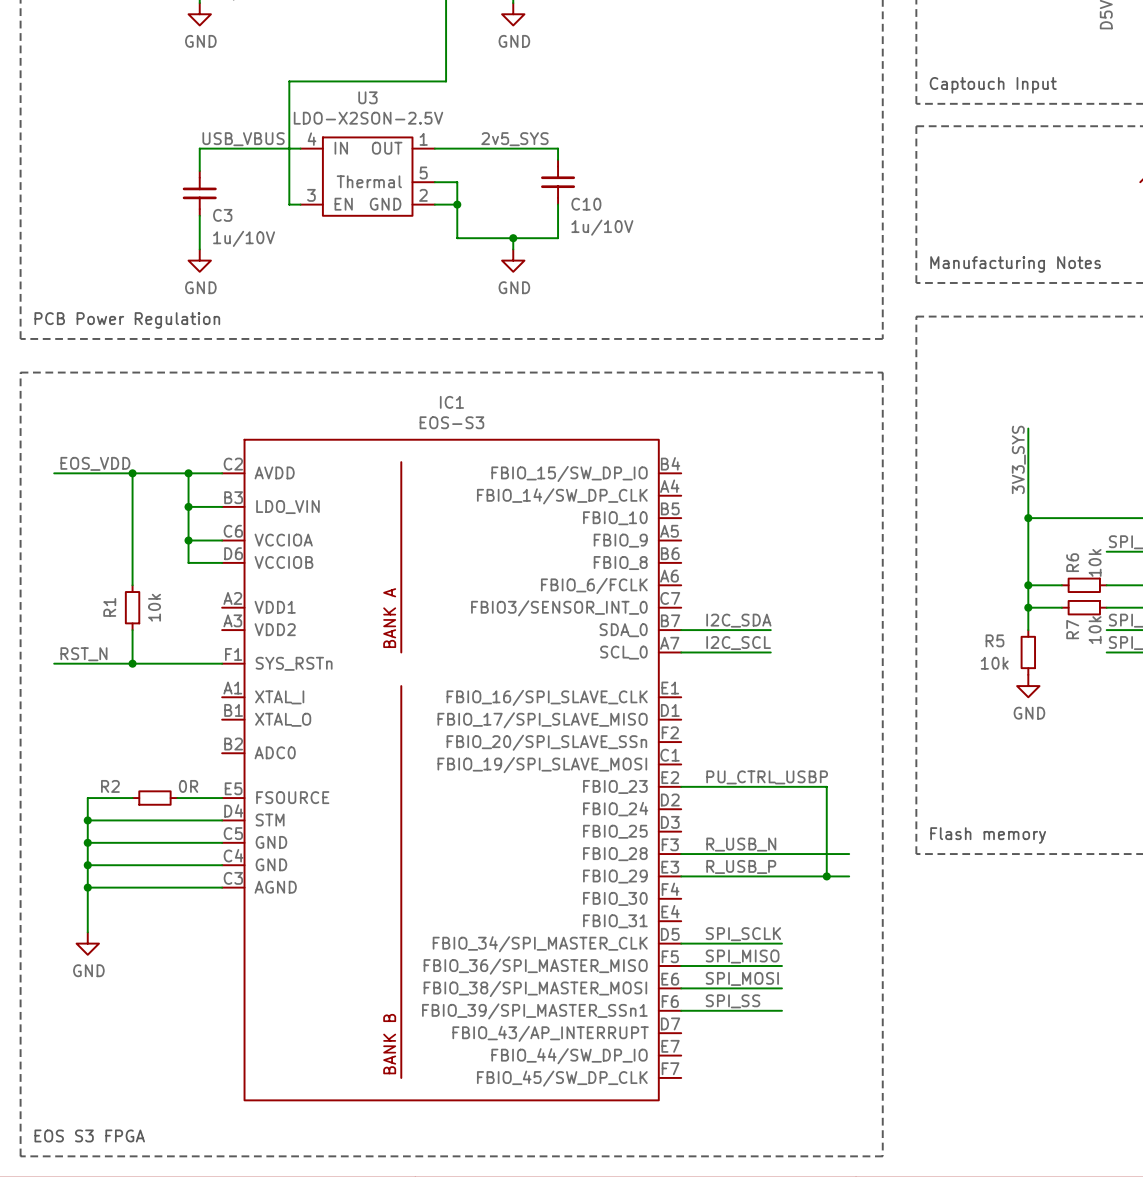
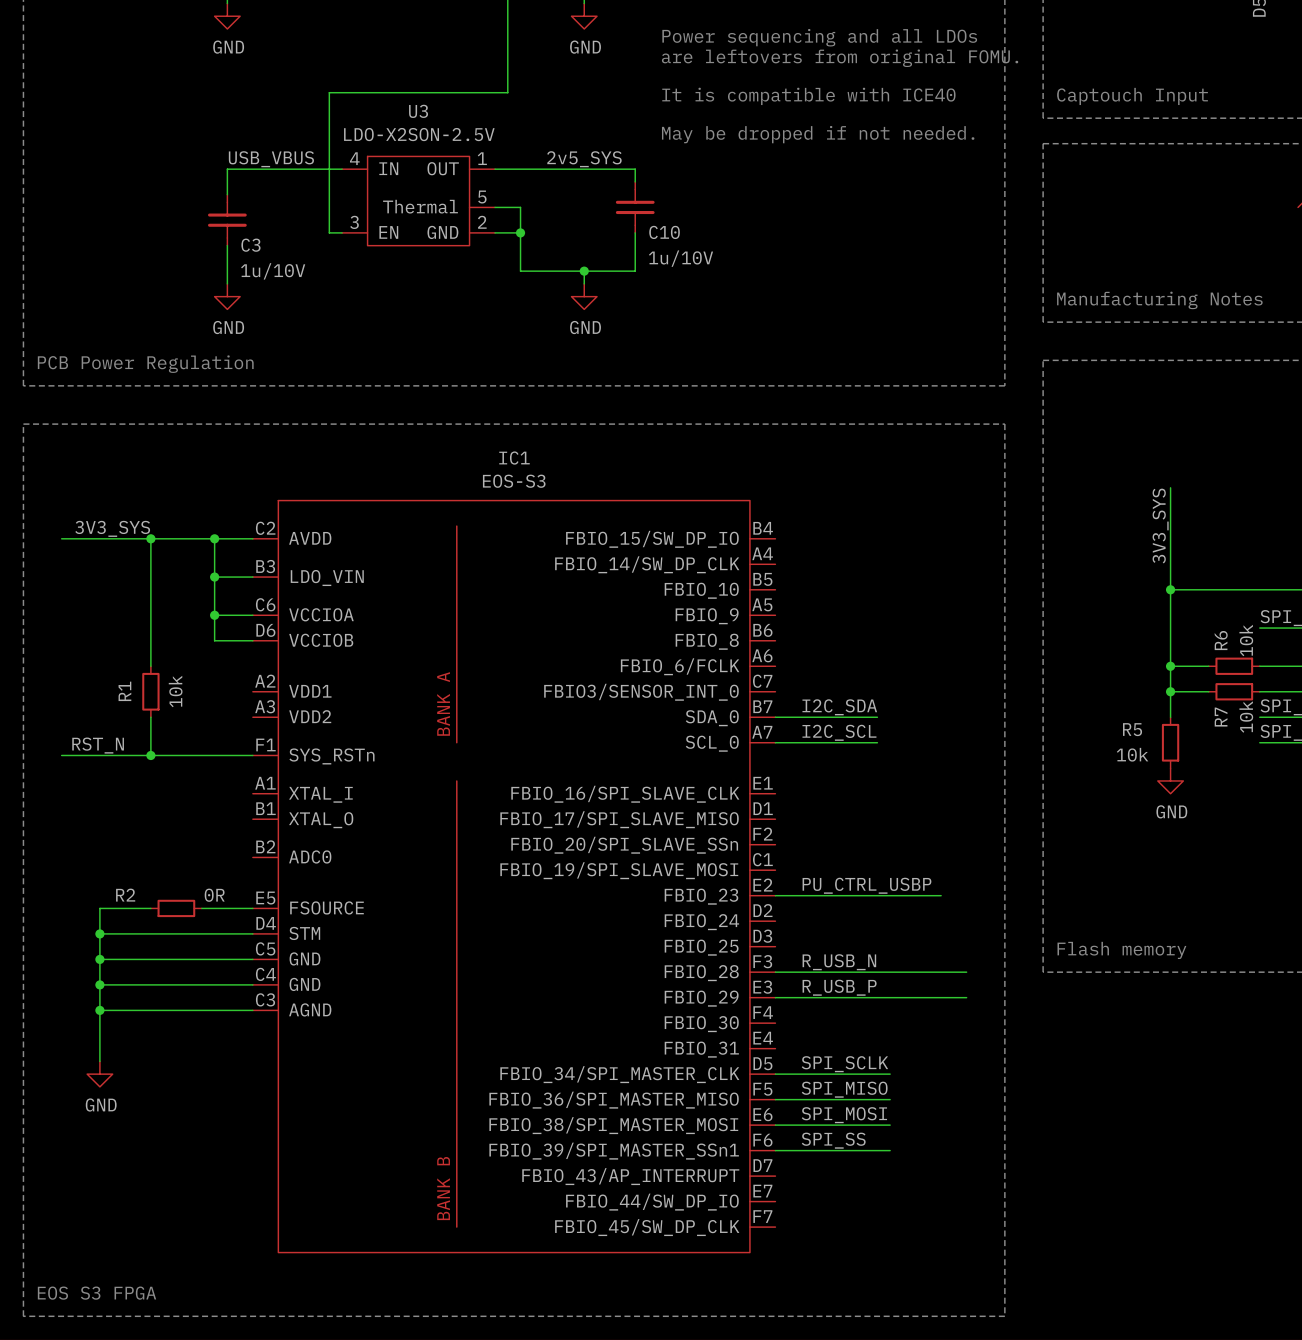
text: none -> Power sequencing and all LDOs (819, 37)
text: none -> are leftovers from original FOMU. (840, 58)
text: none -> It is compatible with ICE40 (808, 96)
text: none -> May be dropped if not needed. (818, 134)
label: EOS_VDD (95, 463) -> none
label: none -> 3V3_SYS (112, 528)
wire: (826, 786) (826, 876) -> none
junction: (826, 876) -> none

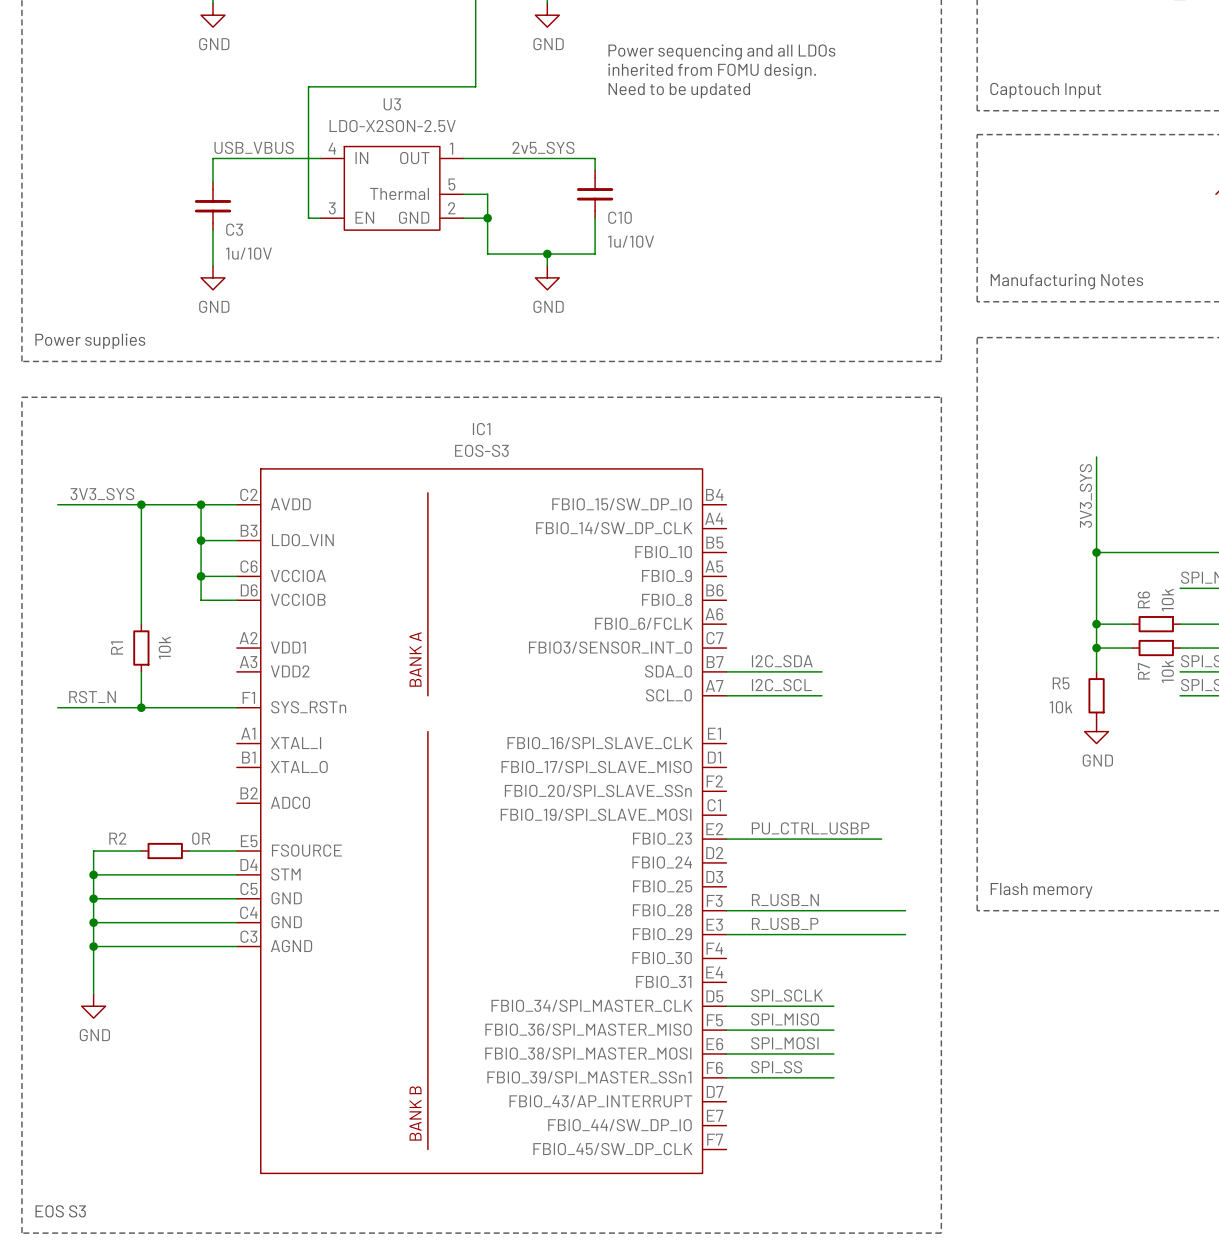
text position: Power sequencing and all LDOs (819, 37) -> Power sequencing and all LDOs (721, 52)
text: are leftovers from original FOMU. (840, 58) -> none
text: none -> inherited from FOMU design. (712, 71)
text: none -> Need to be updated (679, 90)
text: It is compatible with ICE40 (808, 96) -> none
text: May be dropped if not needed. (818, 134) -> none
text: PCB Power Regulation (145, 364) -> Power supplies (90, 341)
text: EOS S3 FPGA (96, 1293) -> EOS S3 (60, 1211)

